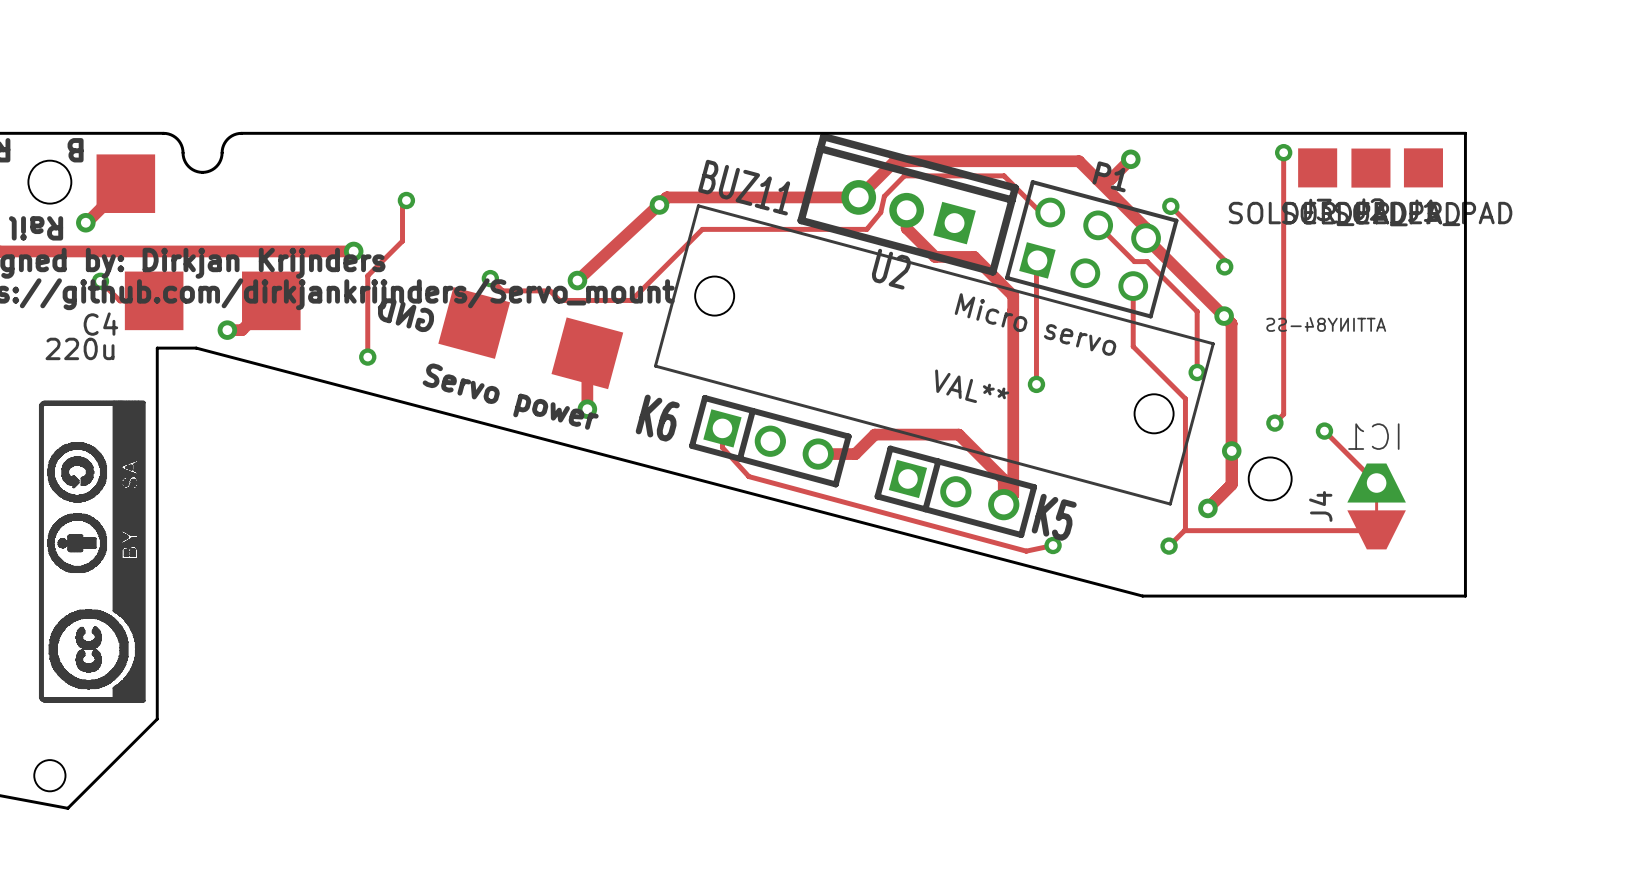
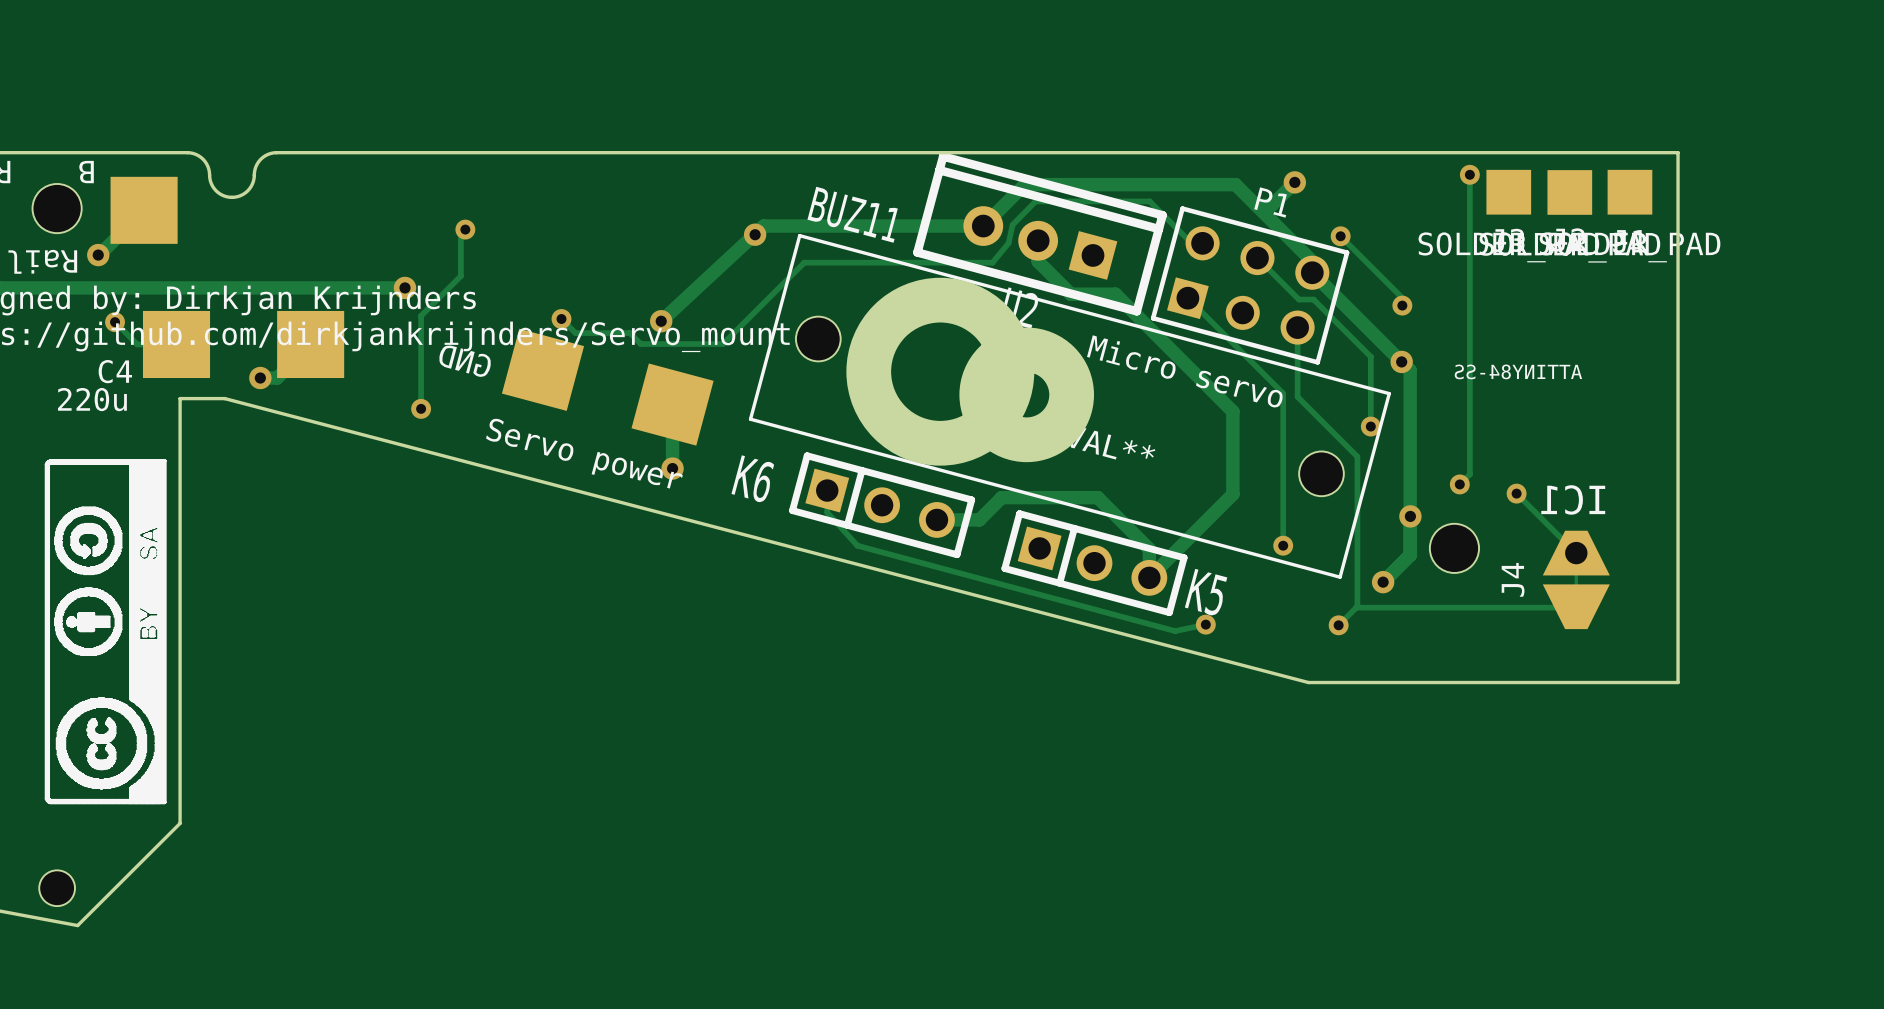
Micro servo footprint: [653, 204, 1215, 506] -> [748, 233, 1391, 579]
track: none -> (1187, 298) (1283, 393) (1283, 545)
track: (1036, 261) (1036, 384) -> none
track: (1013, 295) (1013, 495) -> (1160, 338) (1232, 411) (1232, 494) (1160, 566)
via: (1036, 384) -> none
via: none -> (1283, 545)

